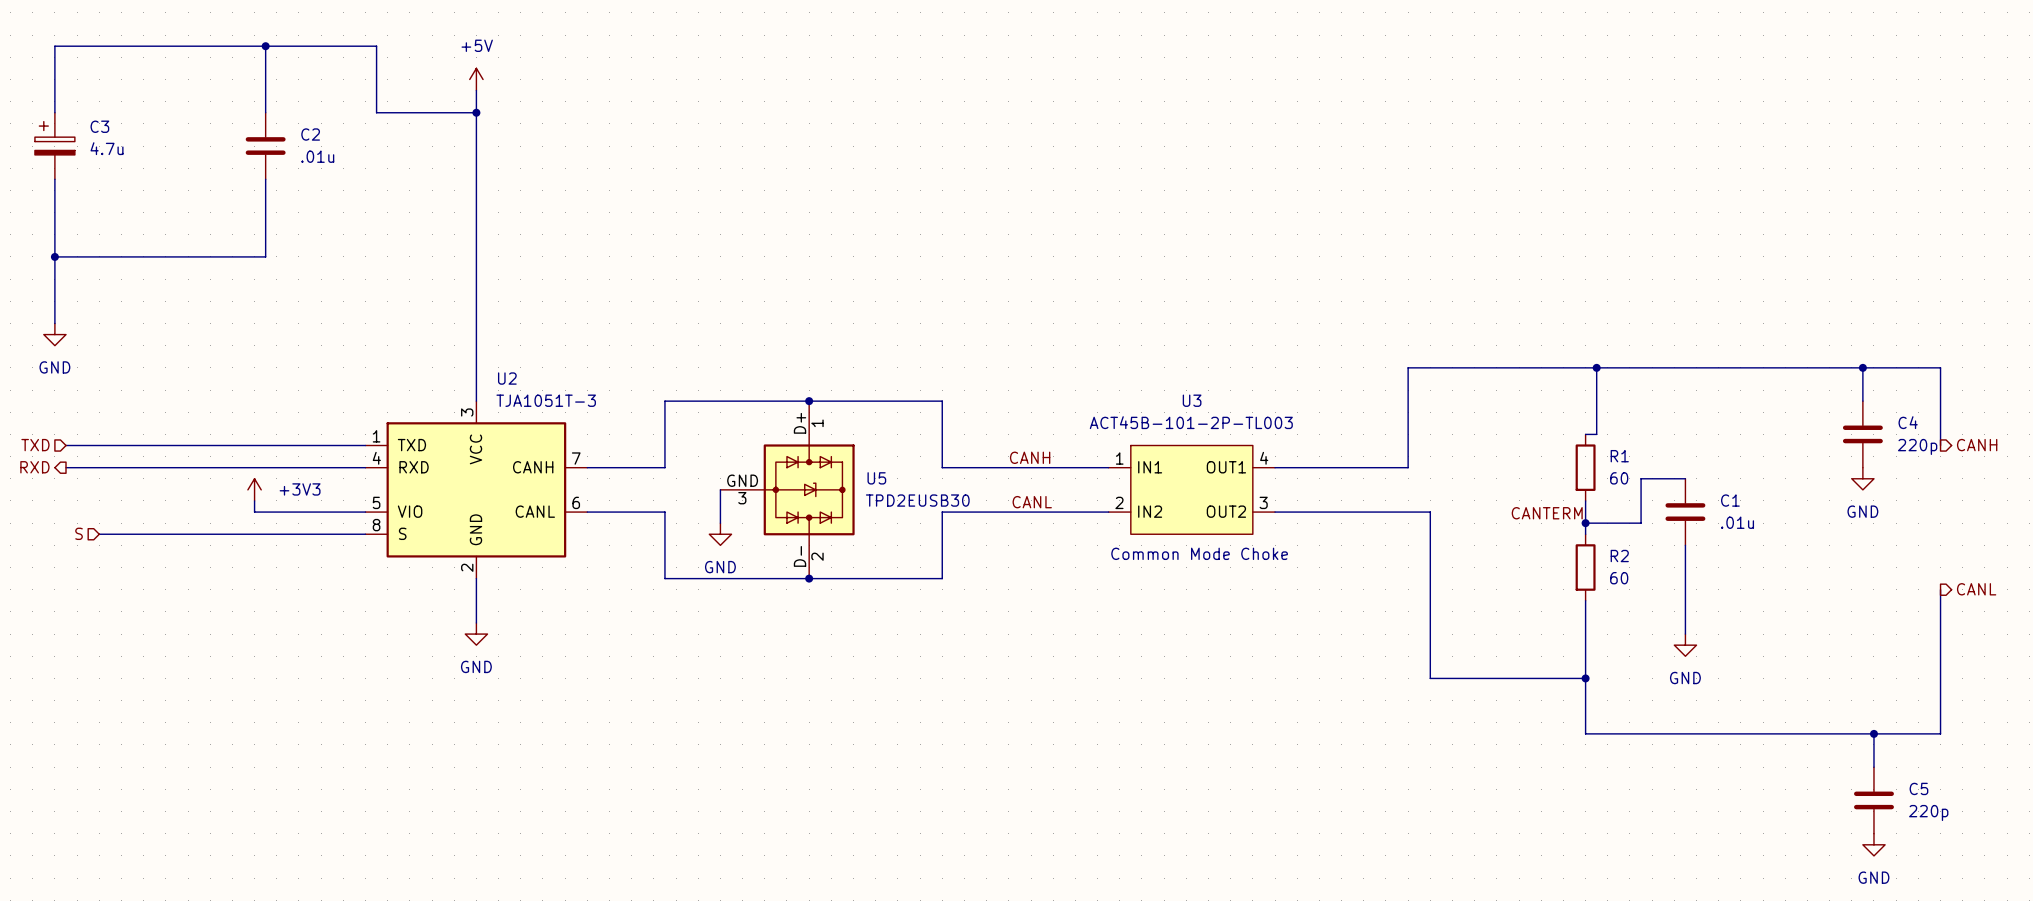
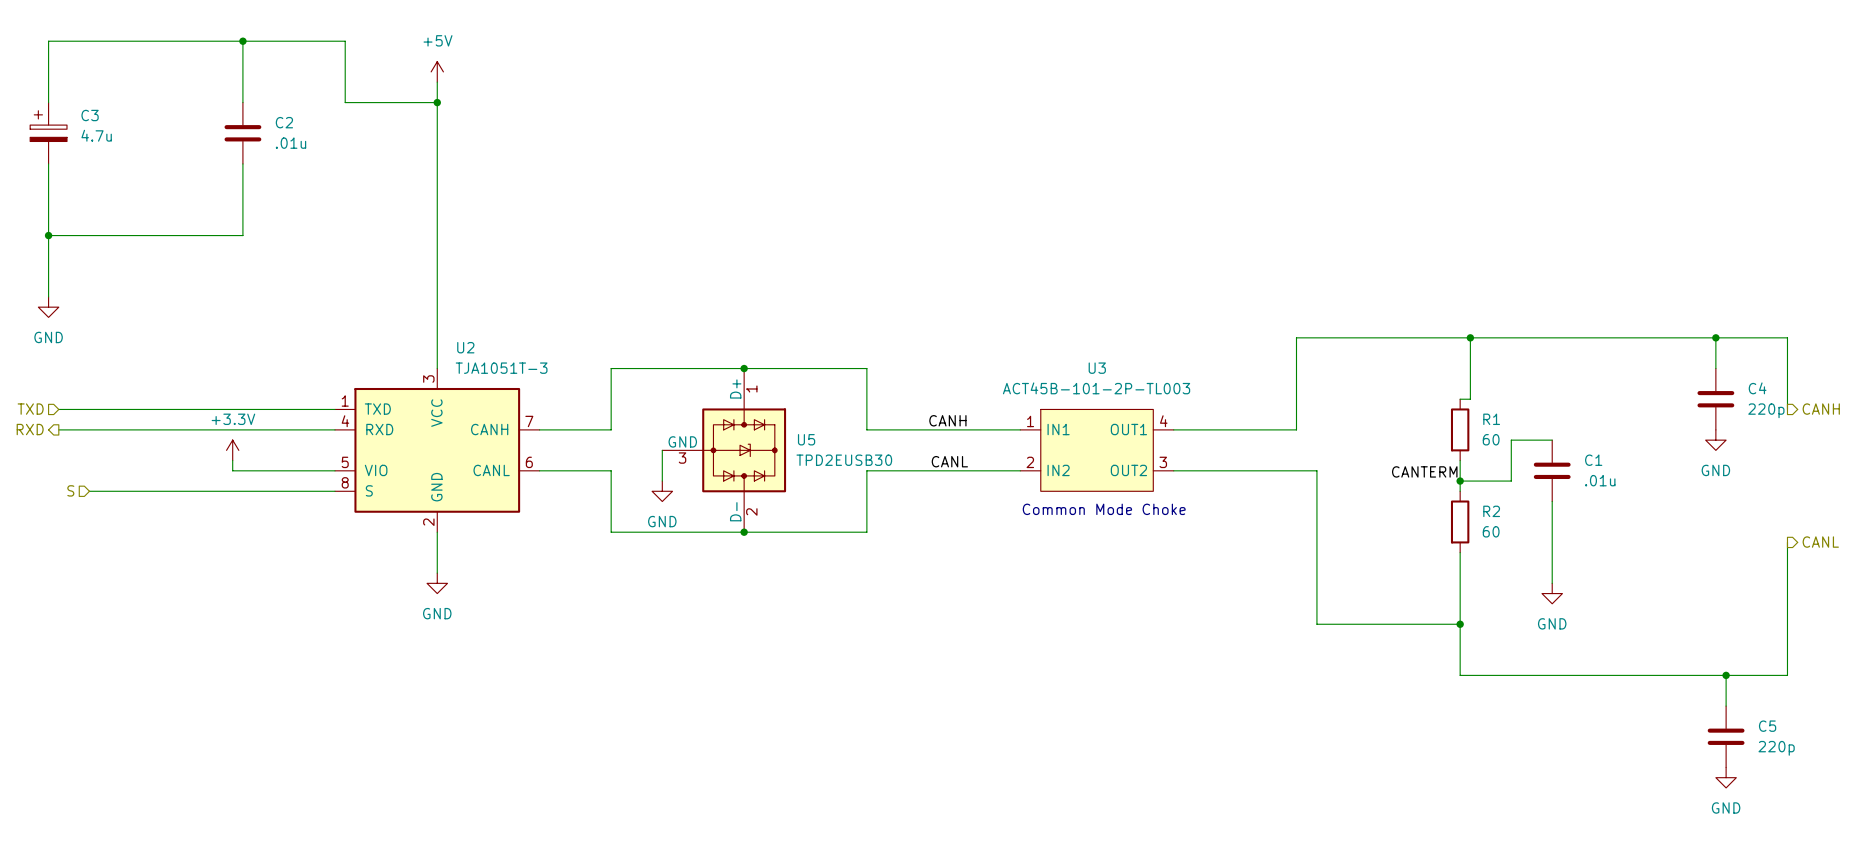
power symbol: +3V3 (254, 489) -> +3.3V (232, 450)

